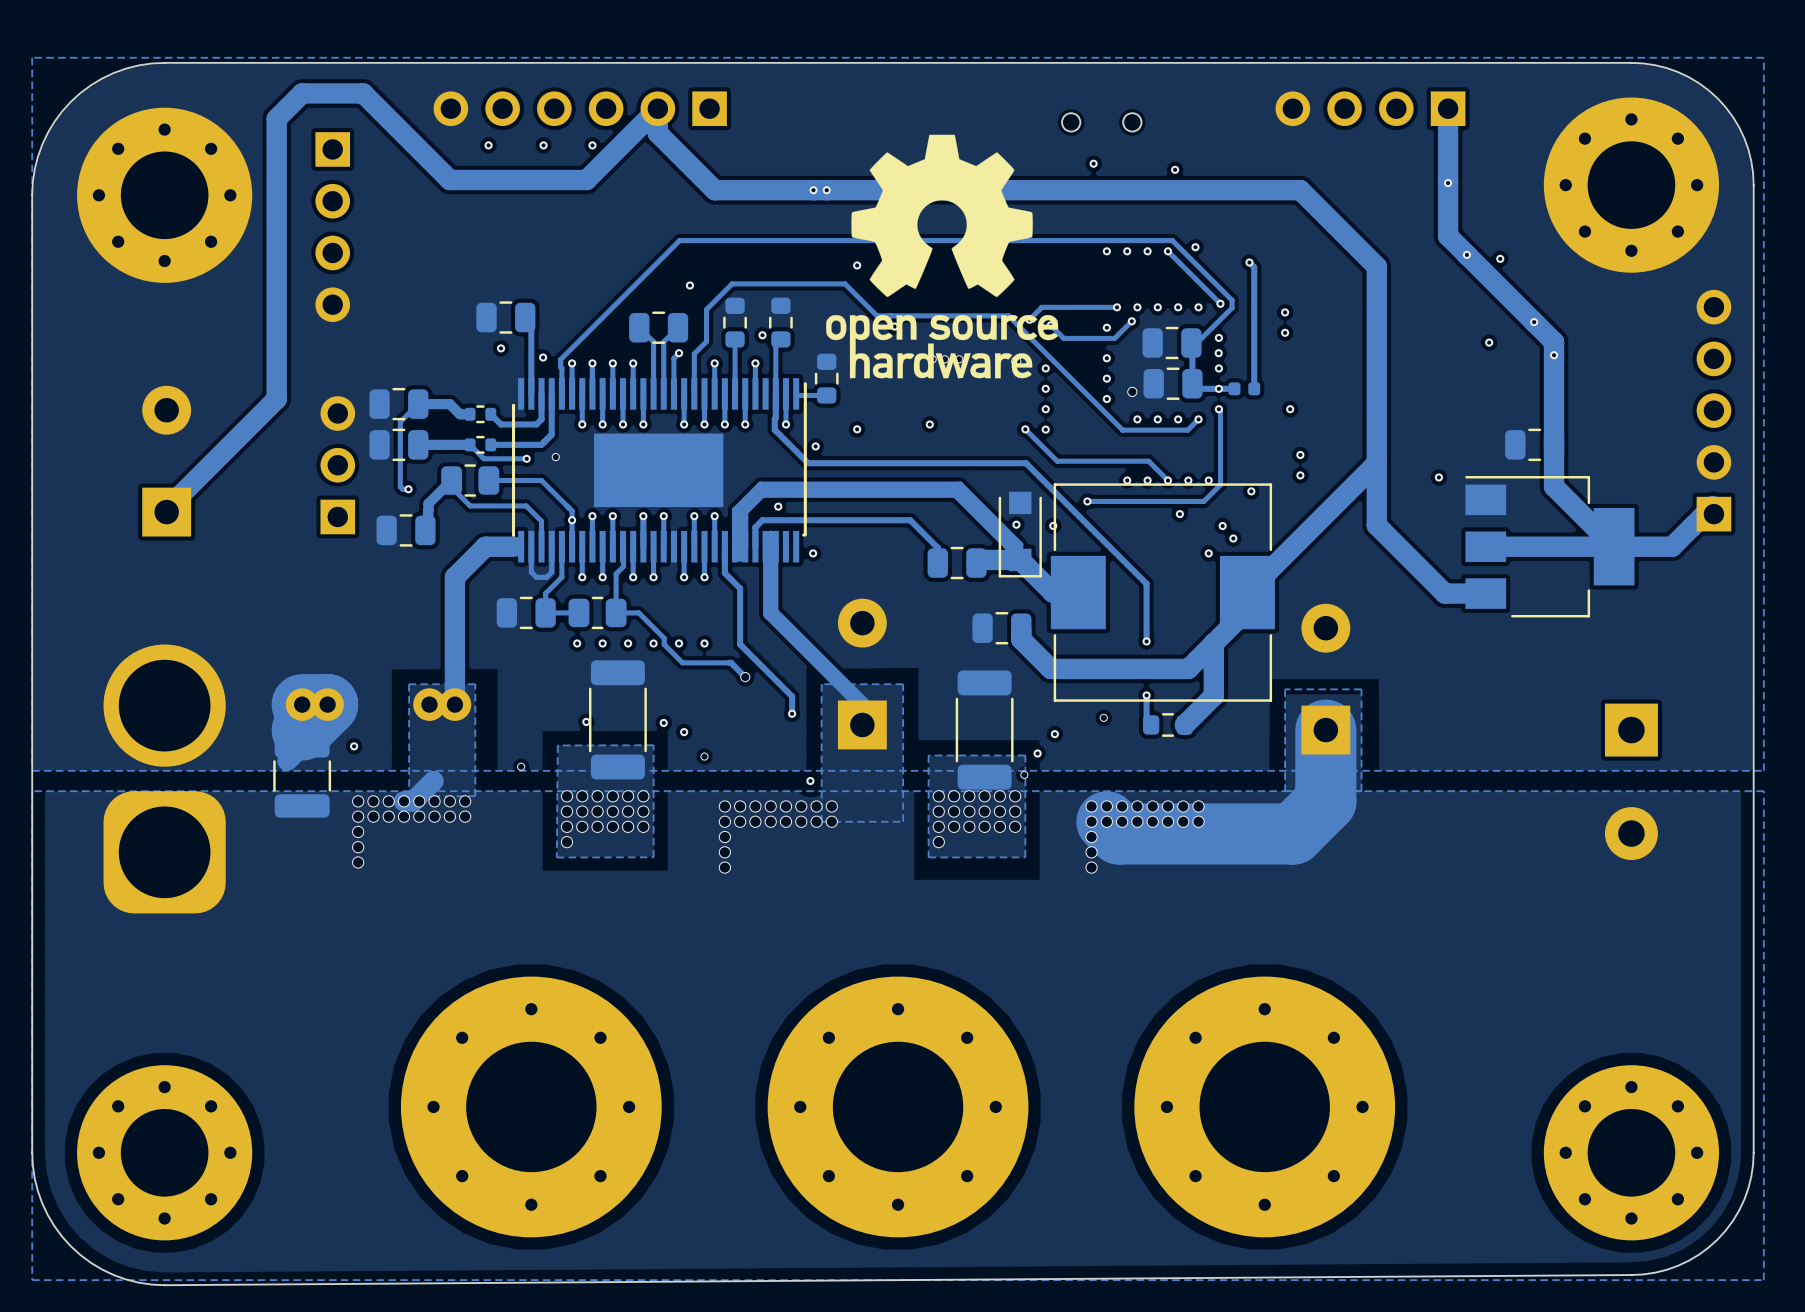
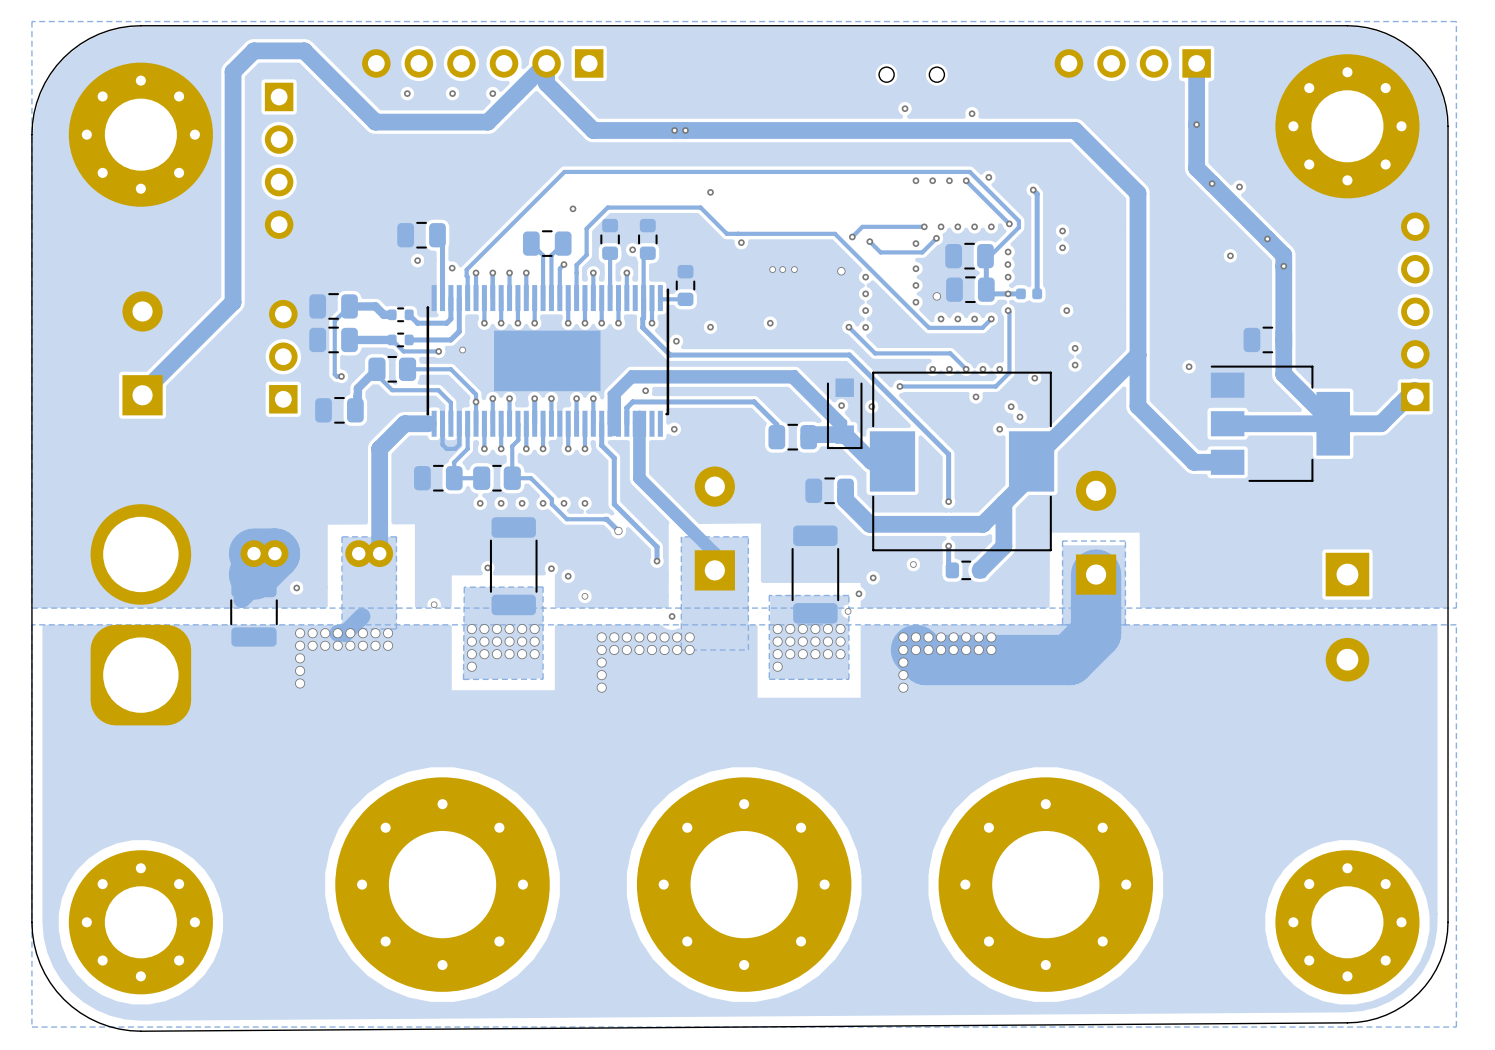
drawing: [826, 134, 1059, 379] -> none

